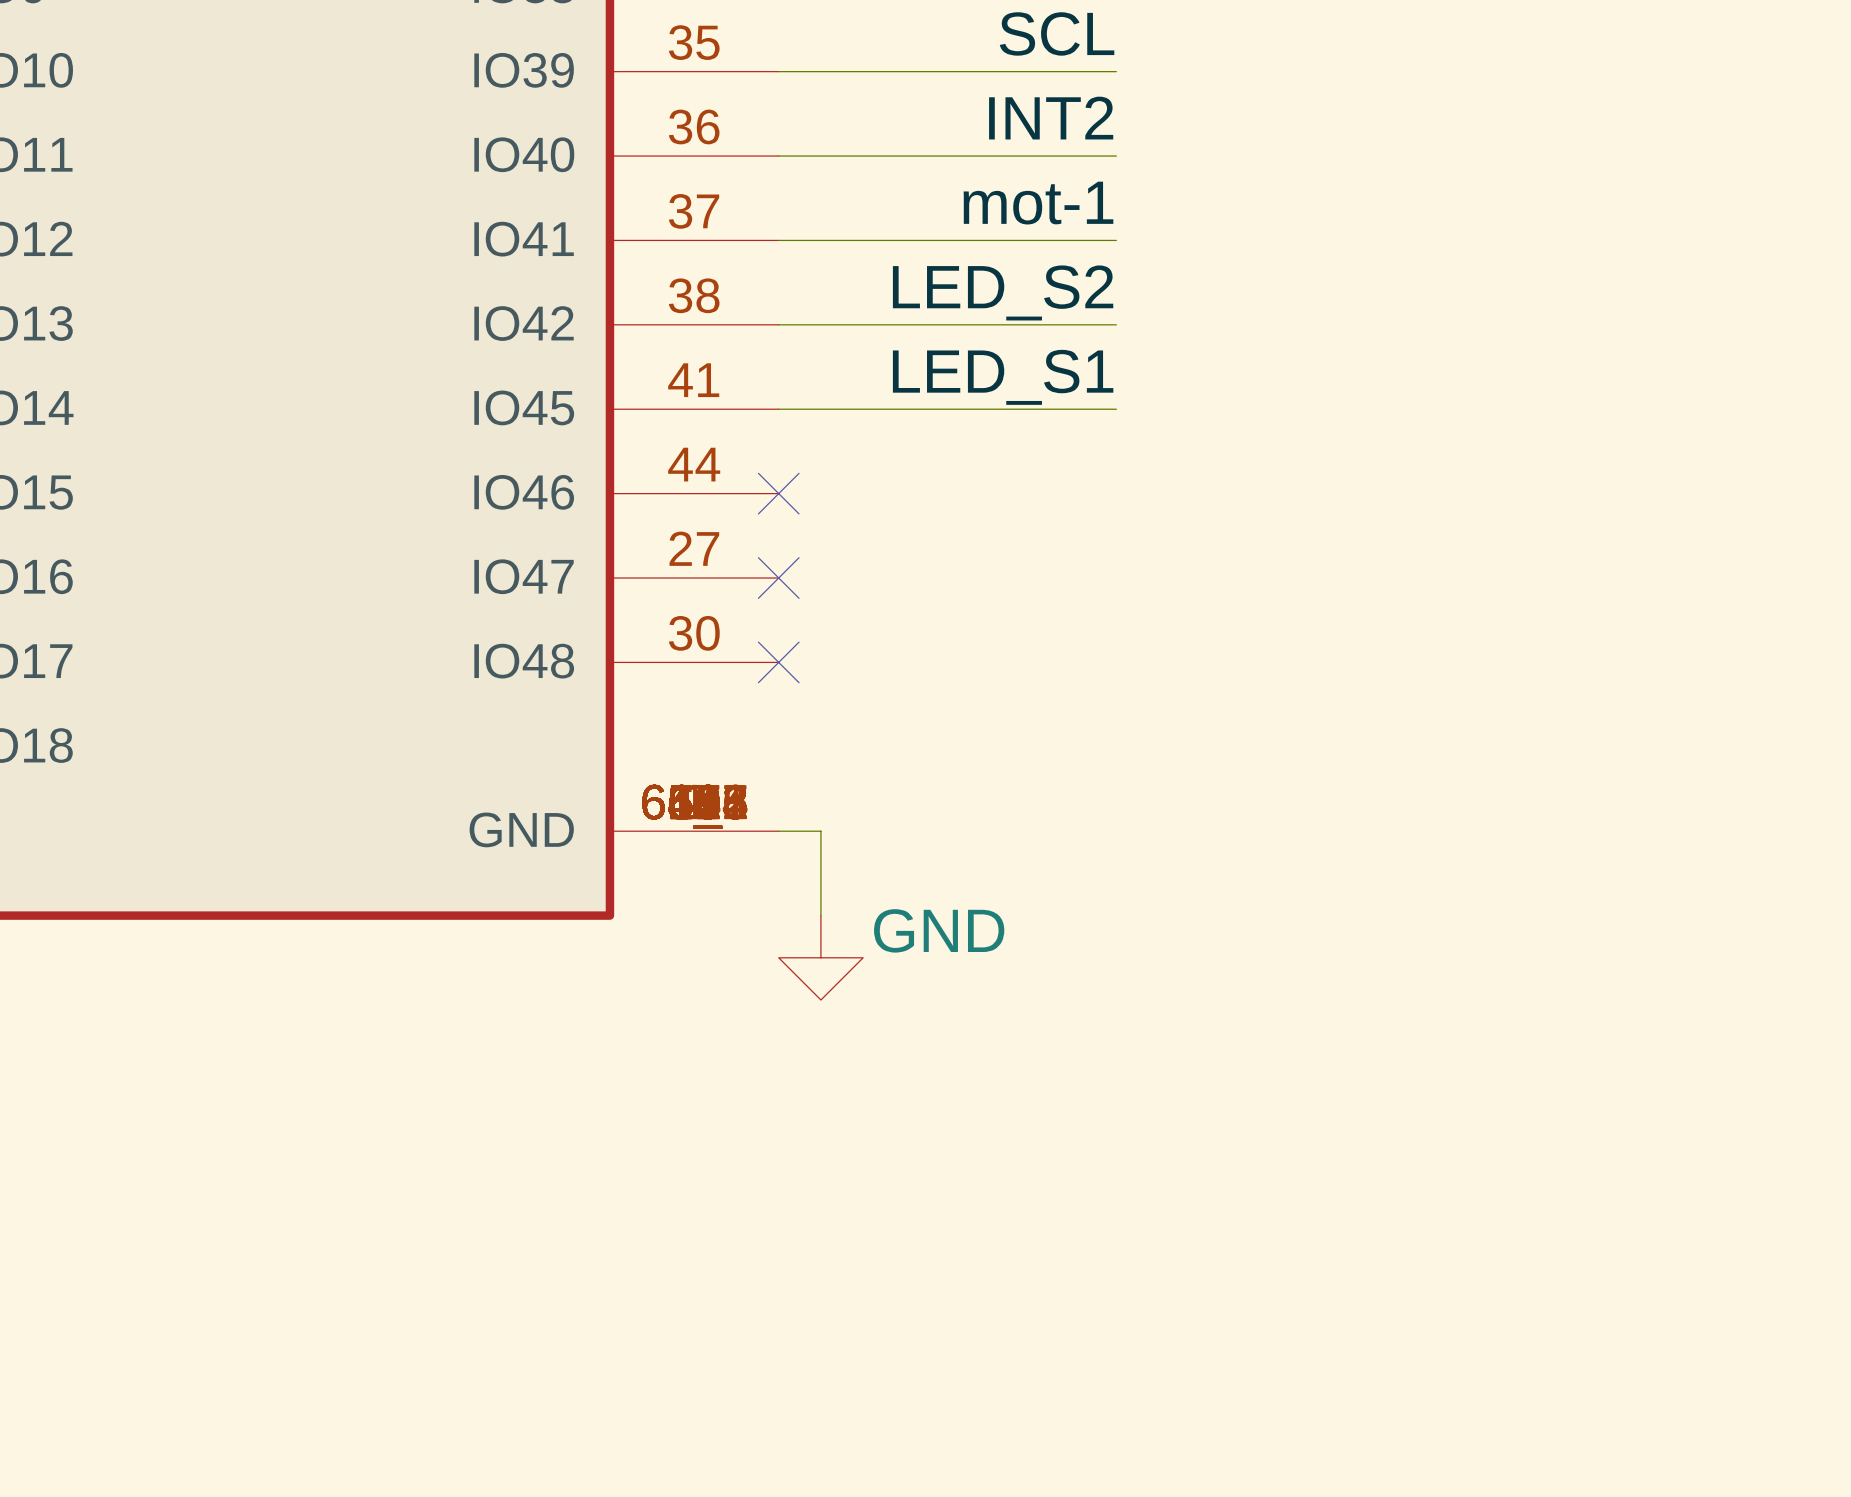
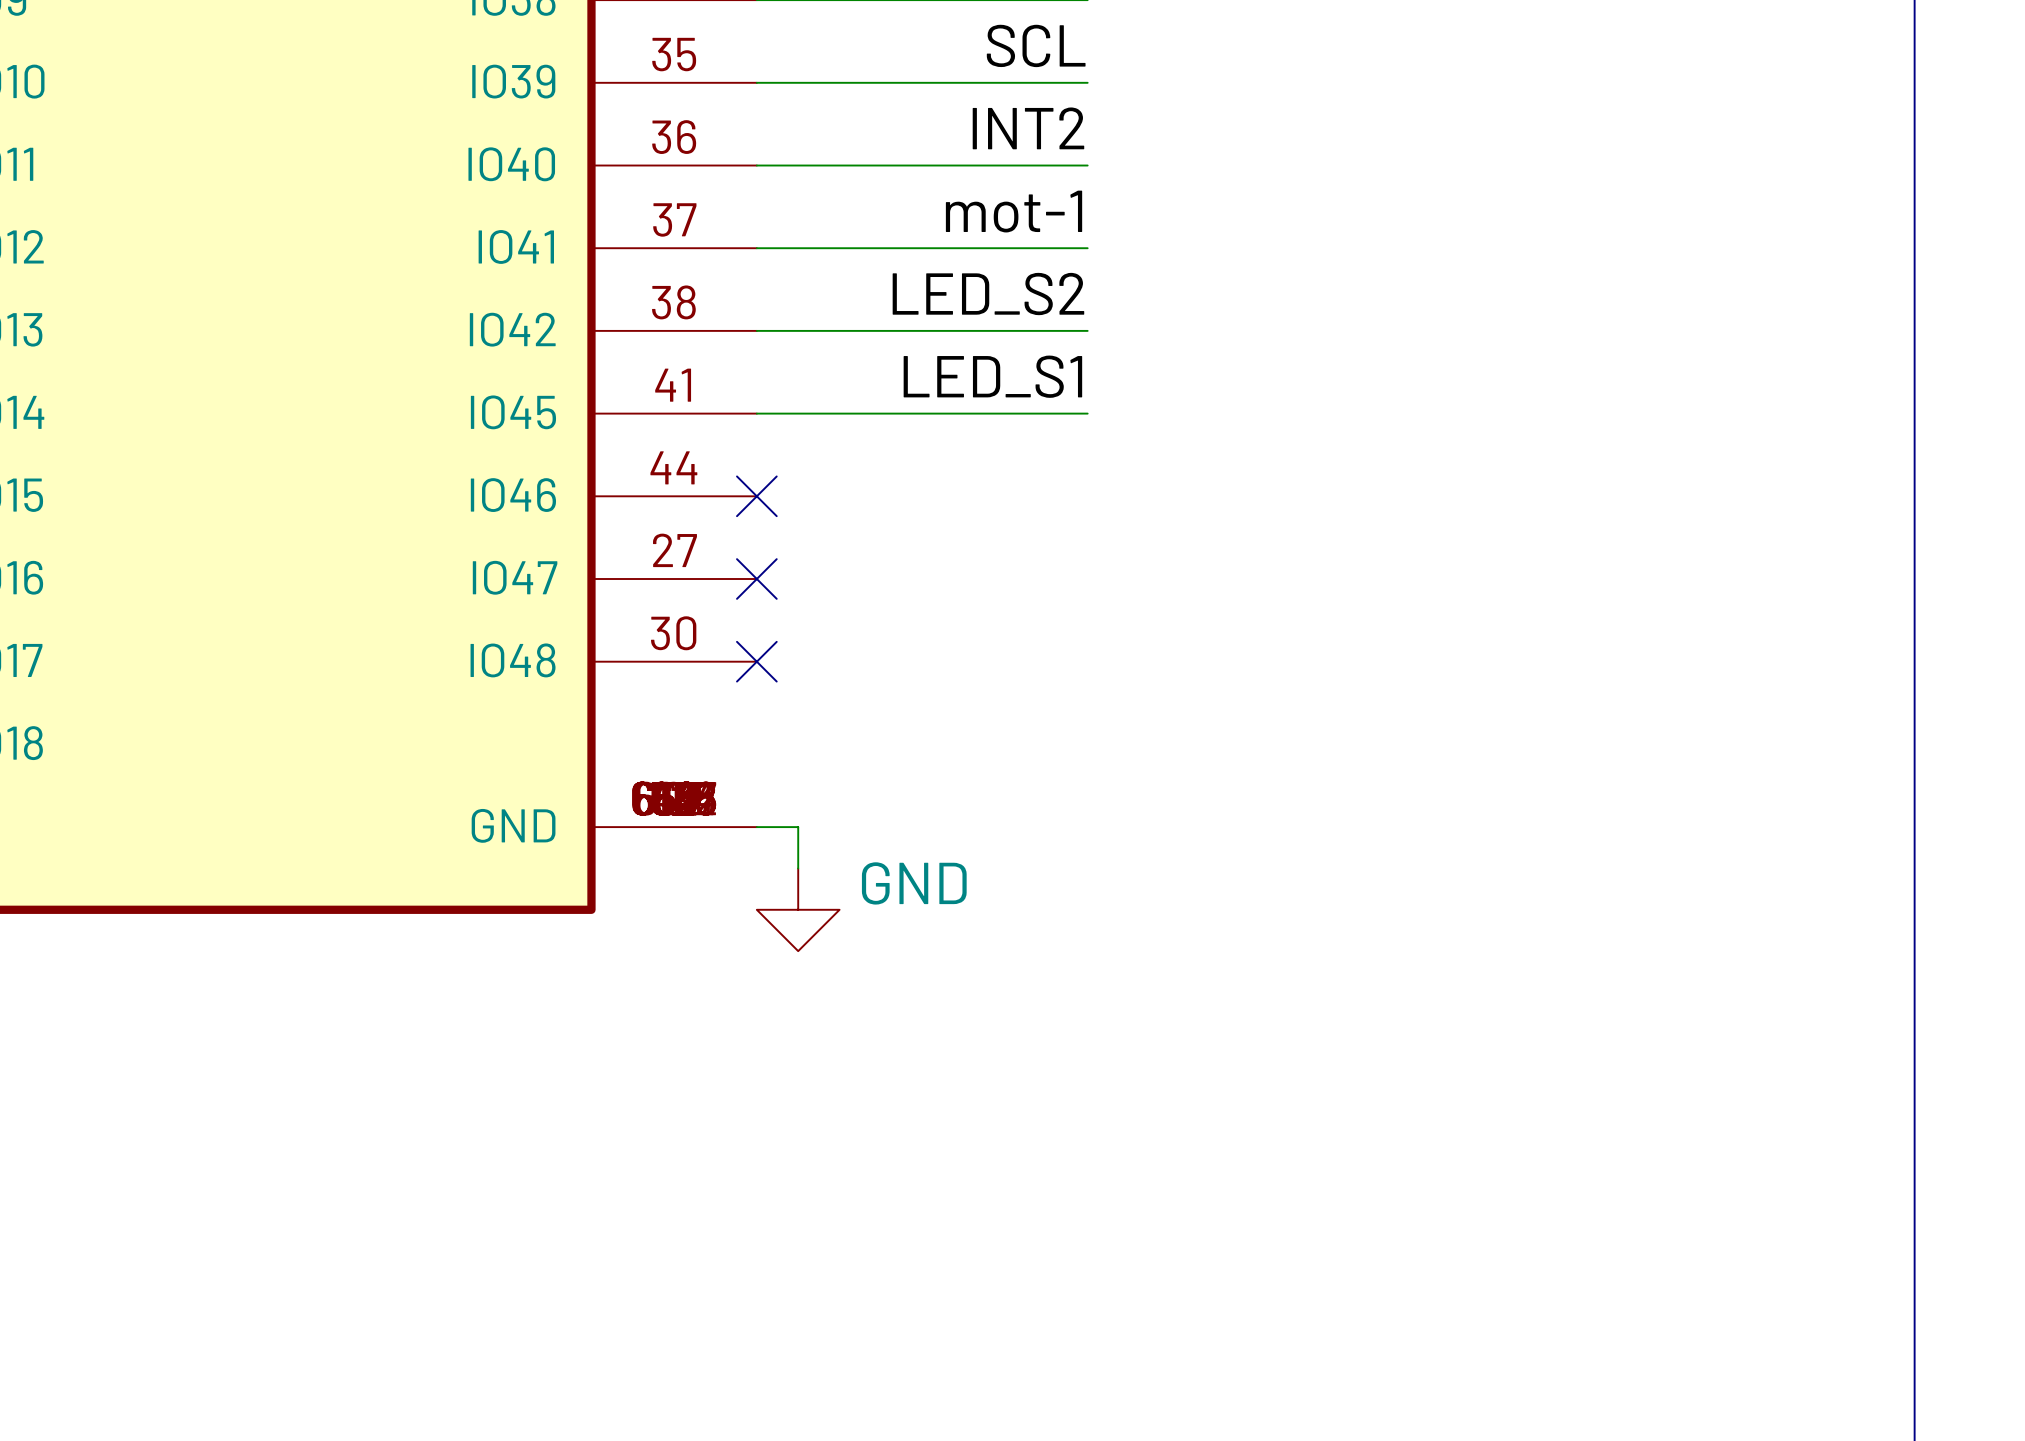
power symbol position: GND (820, 957) -> GND (798, 909)

